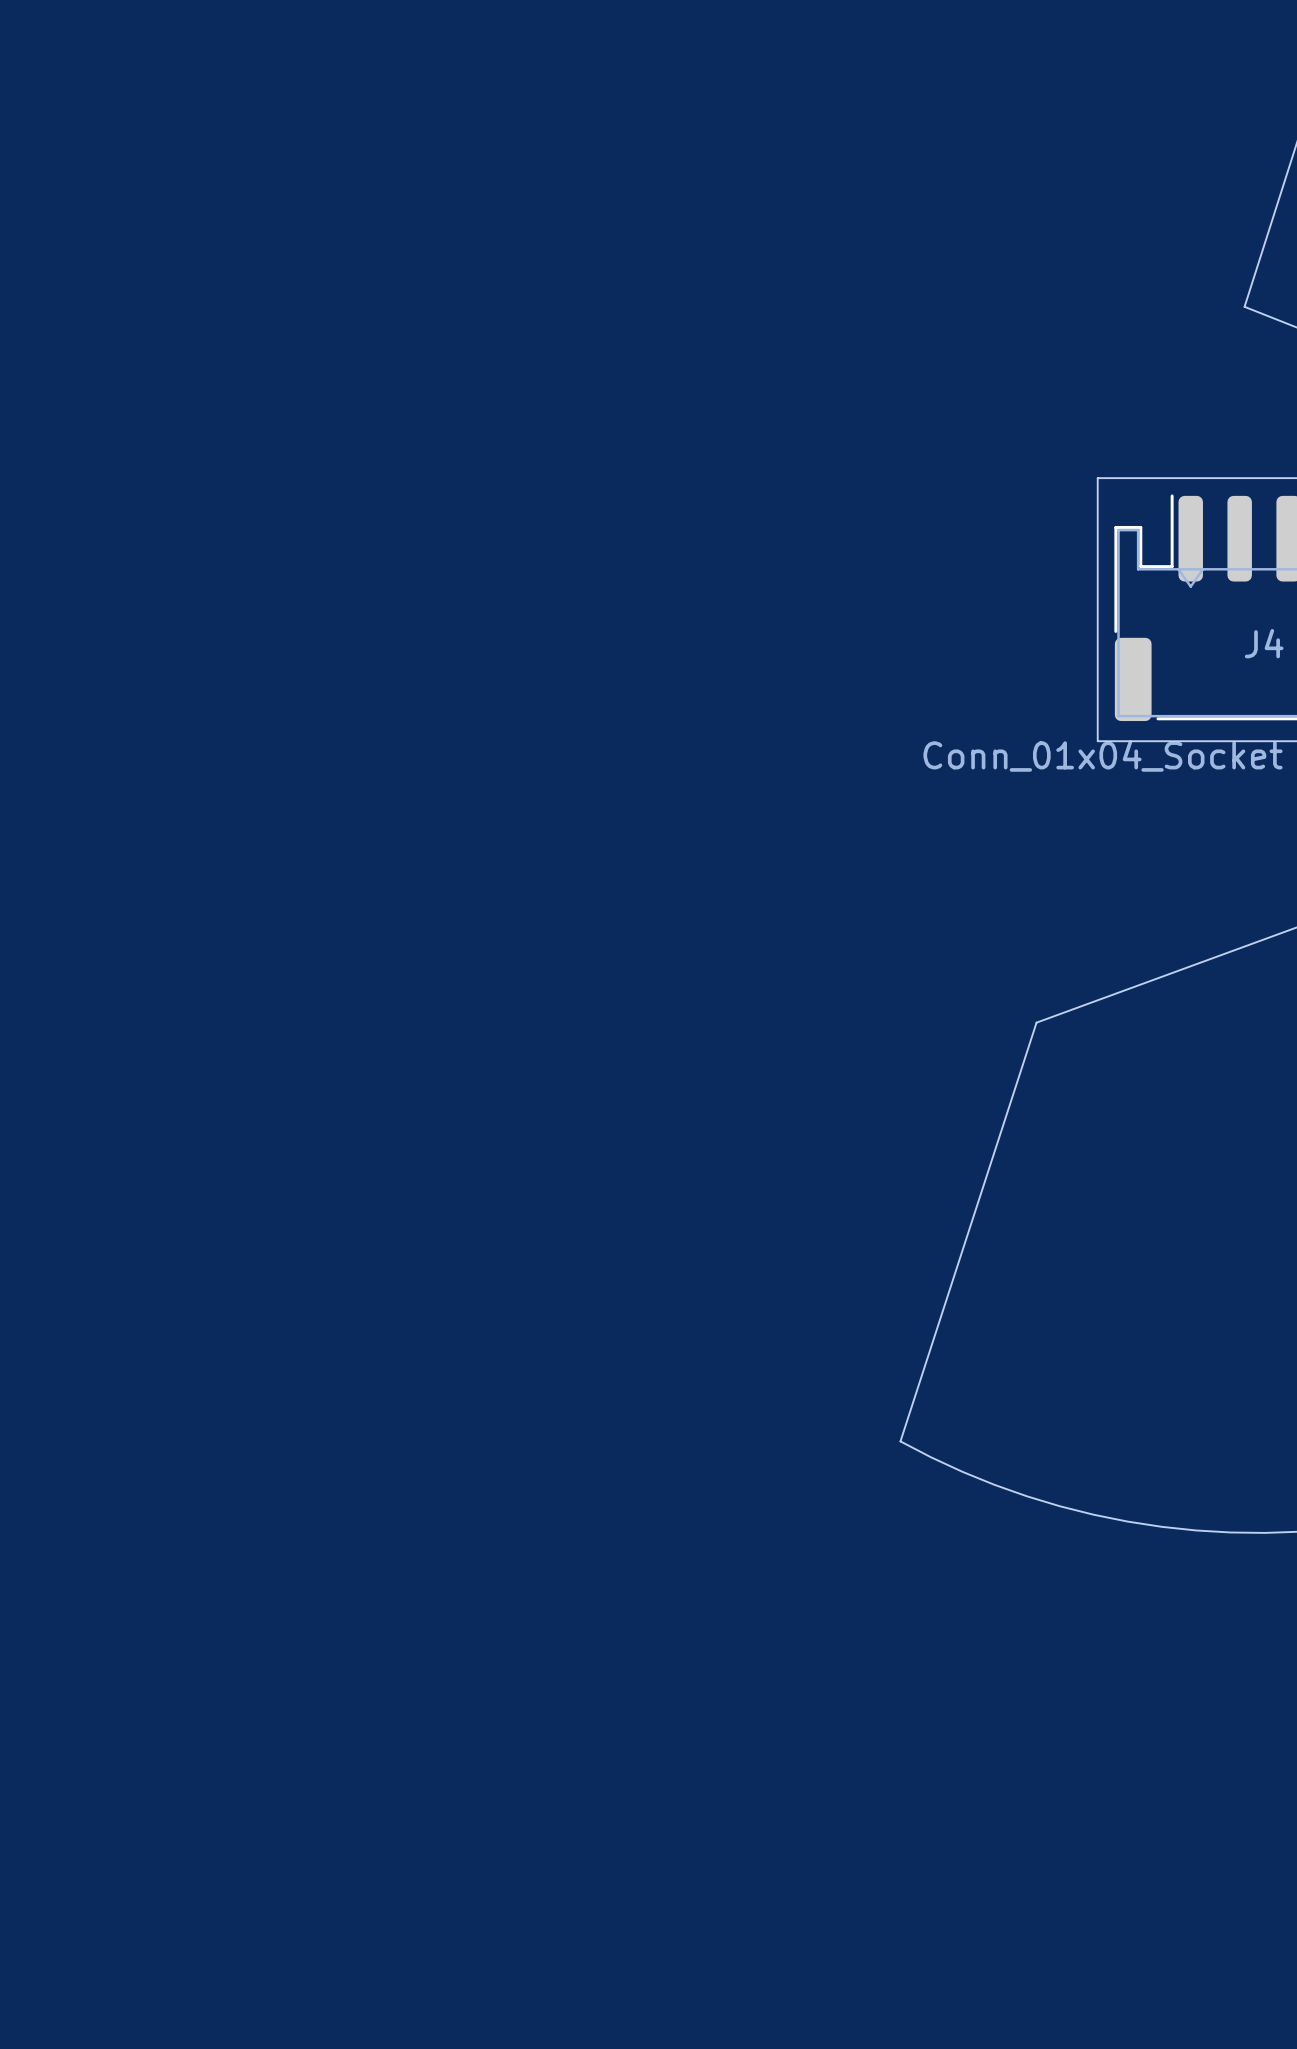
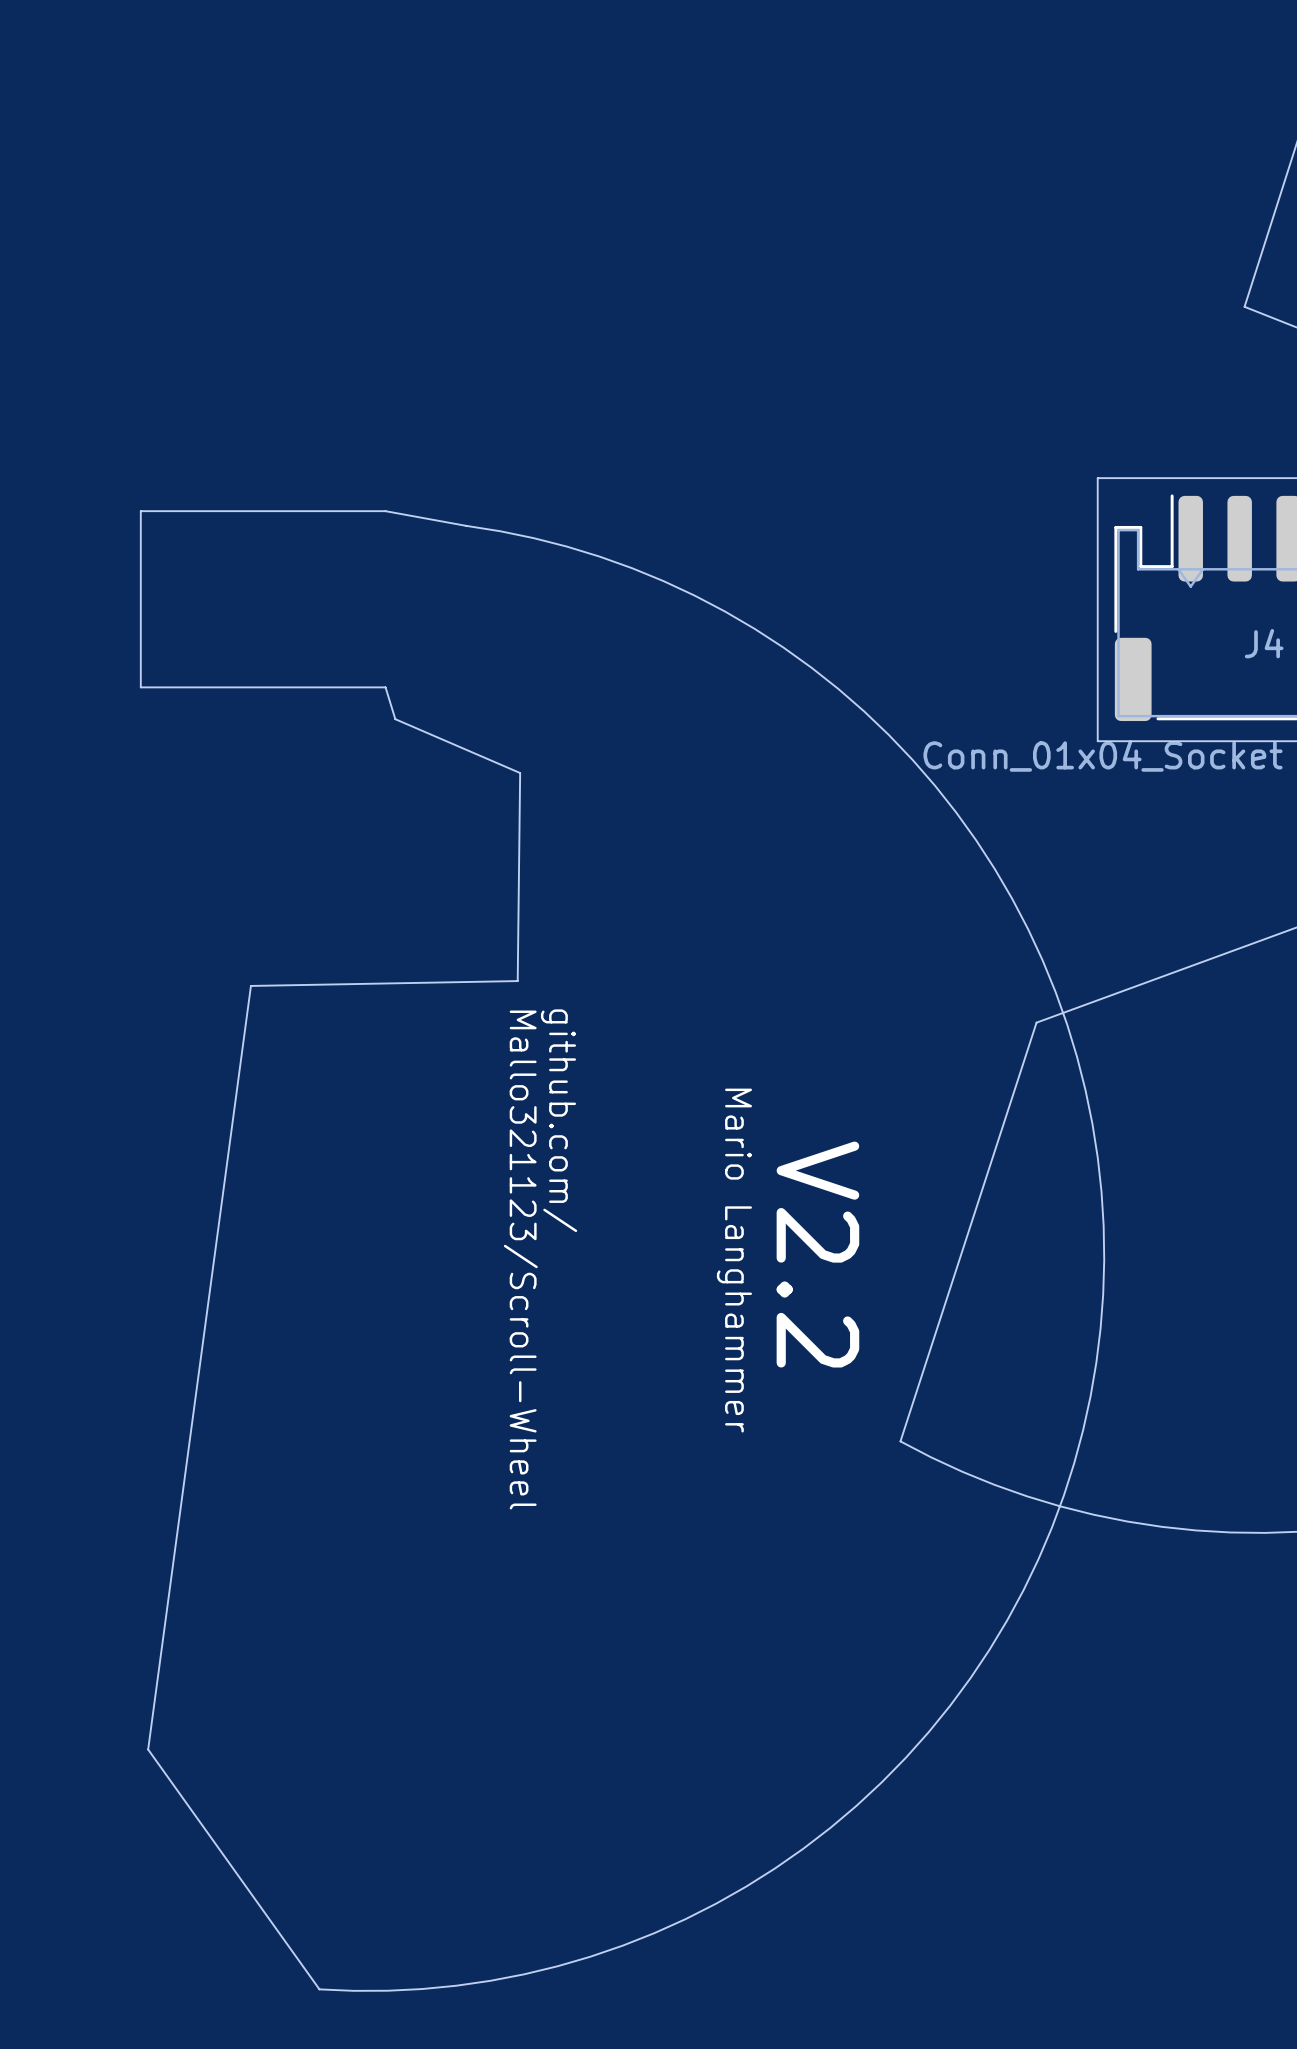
board edge: none -> (385, 511) (533, 538) (599, 556) (663, 581) (725, 611) (783, 647) (838, 688) (888, 734) (935, 785) (976, 840) (994, 869) (1028, 929) (1055, 991) (1077, 1056) (1092, 1123) (1101, 1191) (1104, 1260) (1100, 1328) (1090, 1396) (1083, 1429) (1063, 1495) (1038, 1559) (1007, 1620) (970, 1678) (928, 1732) (881, 1782) (830, 1827) (775, 1868) (746, 1886) (685, 1919) (622, 1945) (557, 1966) (490, 1980) (422, 1989) (353, 1990) (319, 1989) (148, 1749) (250, 985) (517, 981) (520, 773) (395, 719) (385, 687) (140, 687) (140, 511) (385, 511)
text: none -> github.com/ (559, 1120)
text: none -> V2.2 (817, 1254)
text: none -> Mallo321123/Scroll-Wheel (520, 1259)
text: none -> Mario Langhammer (734, 1260)

